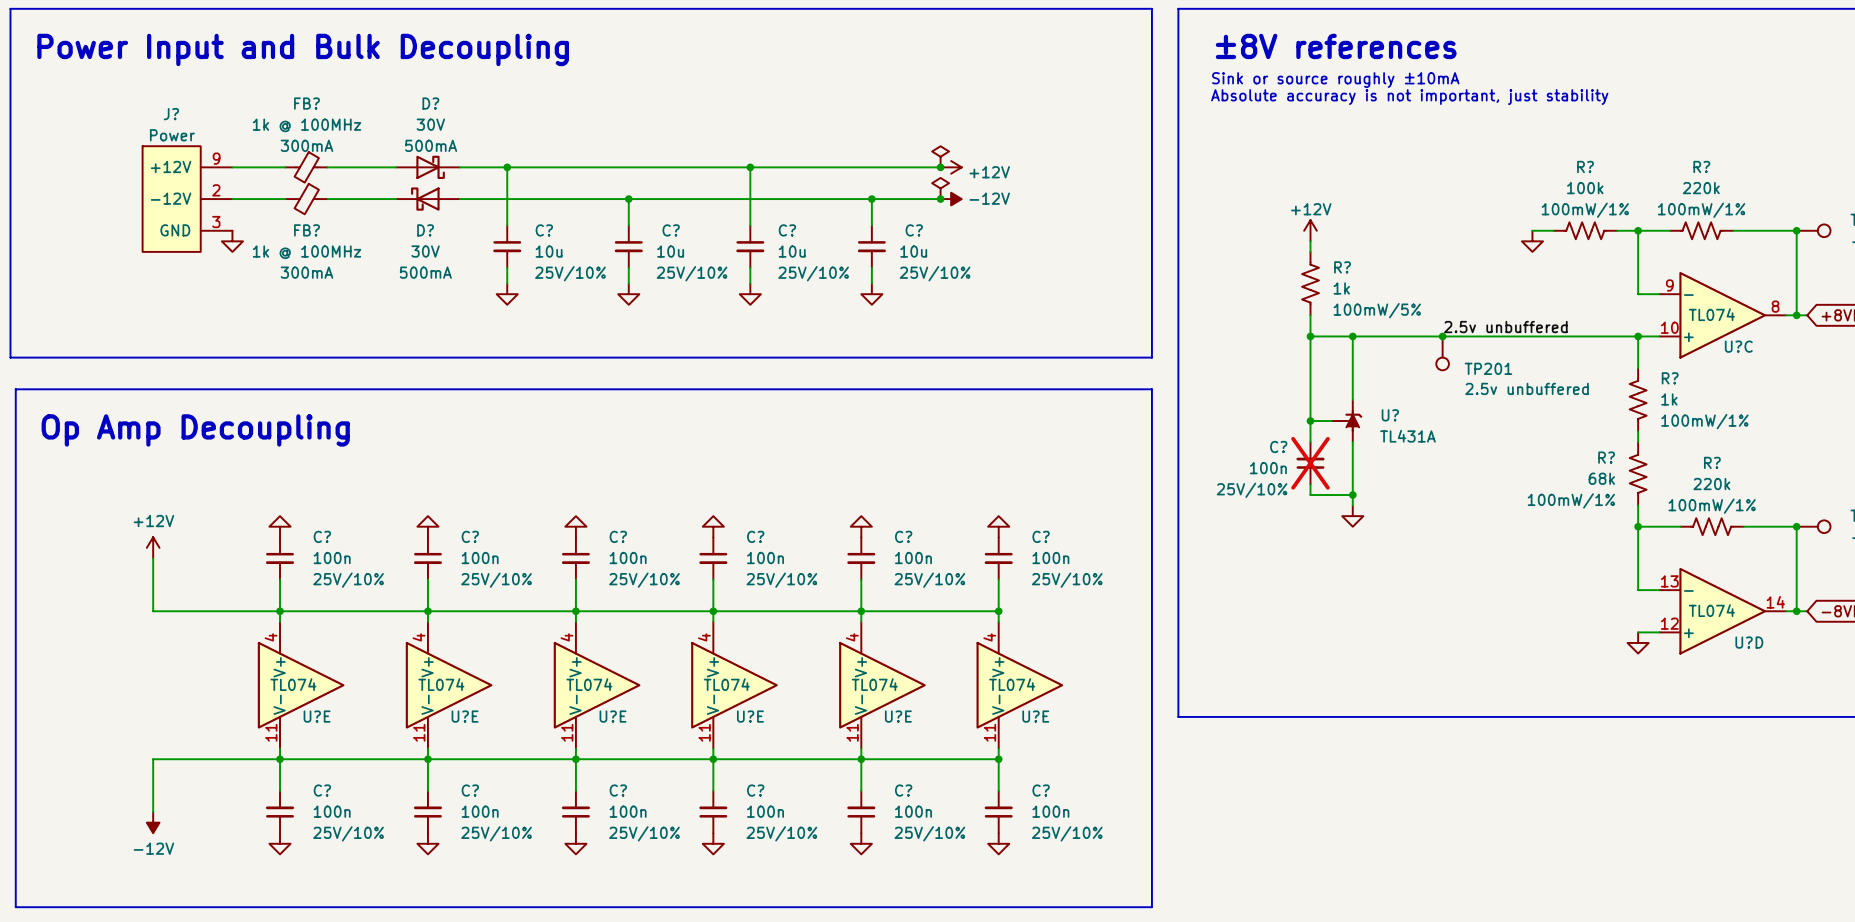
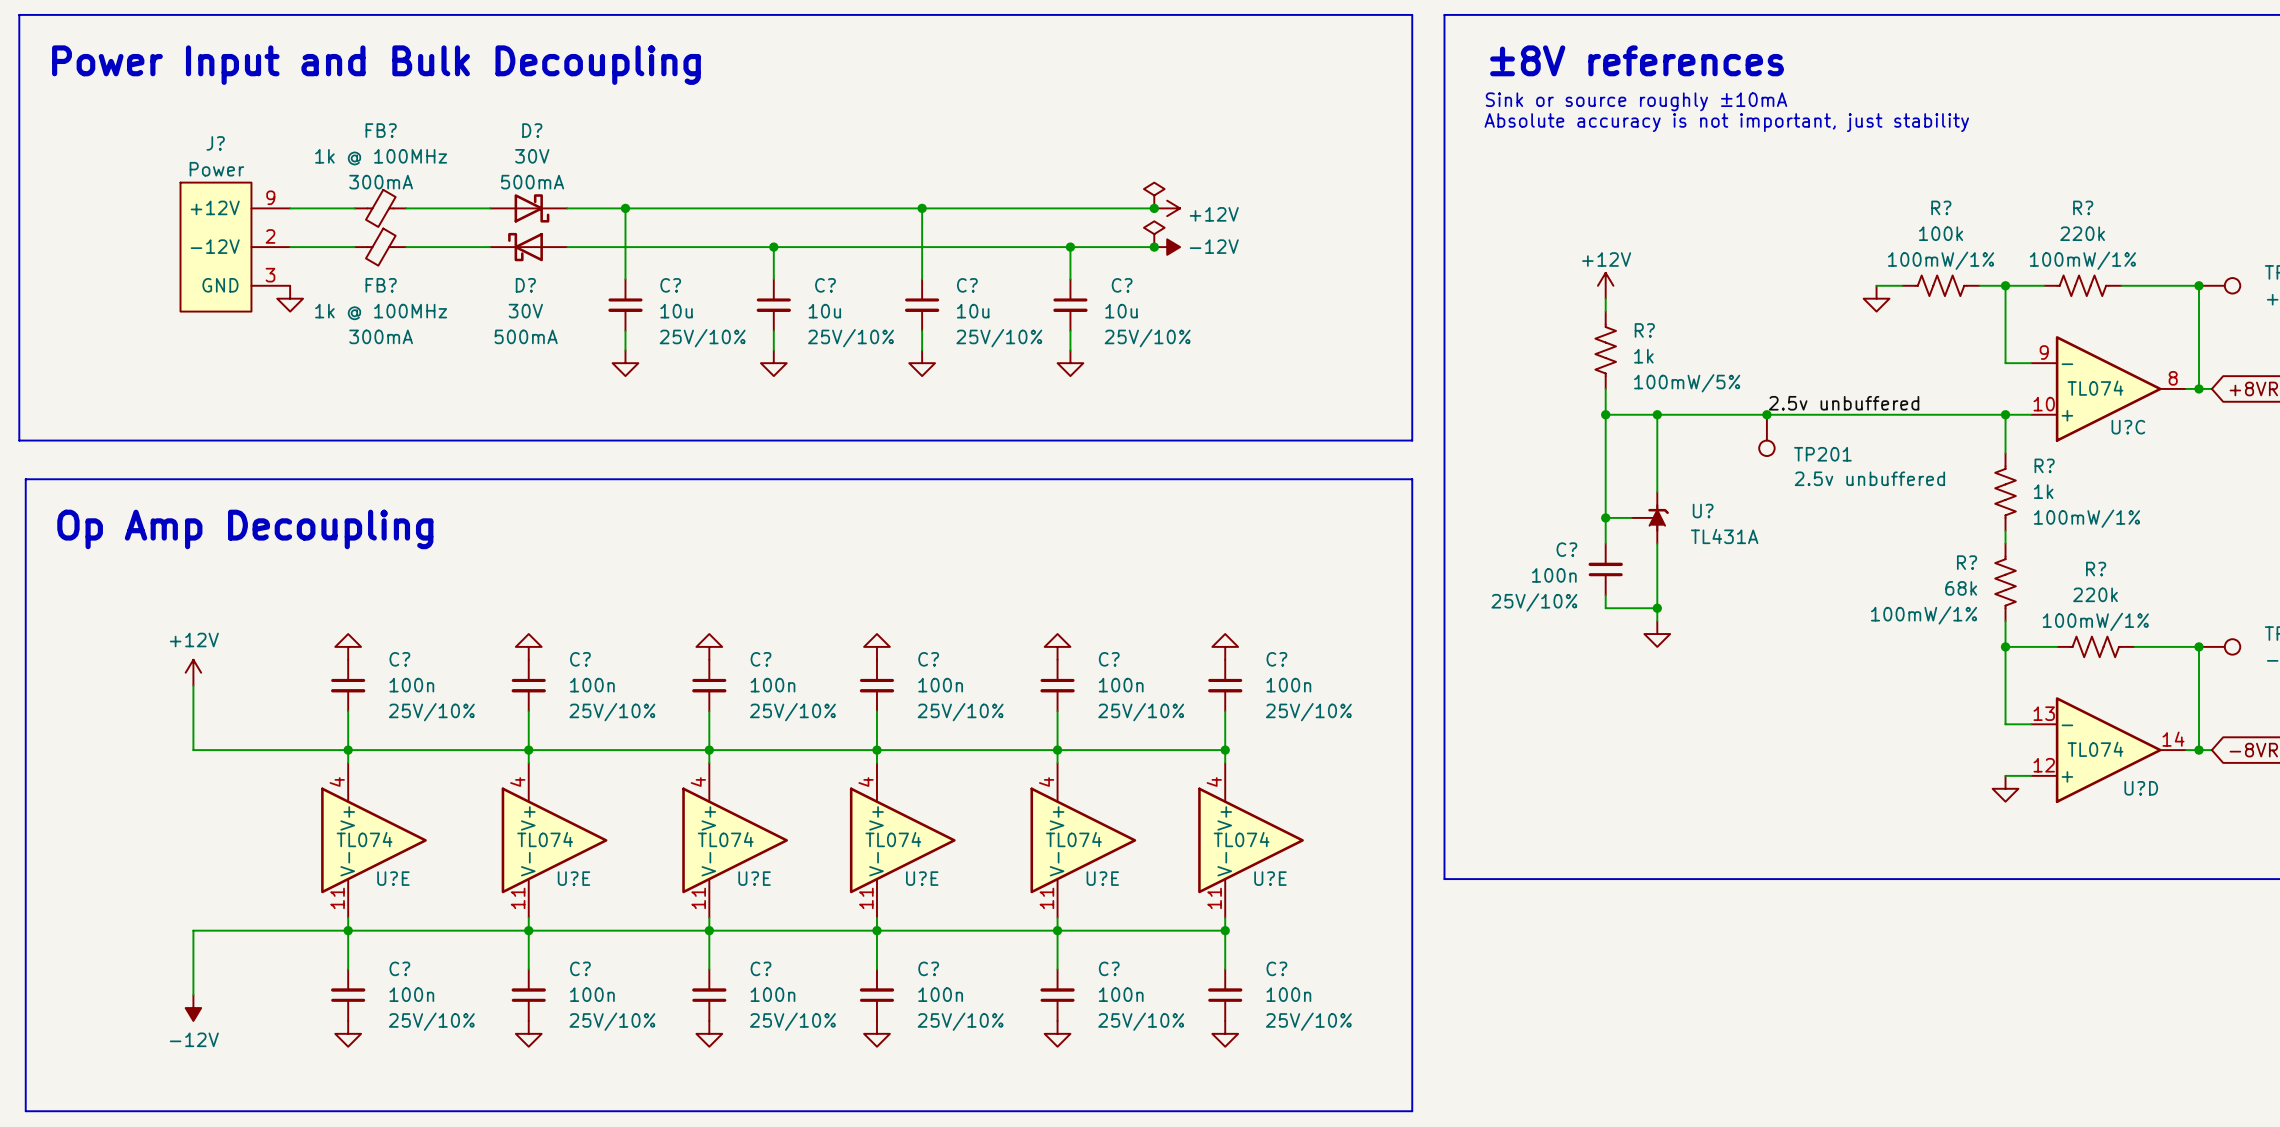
C? do-not-place cross: (1310, 463) -> none

